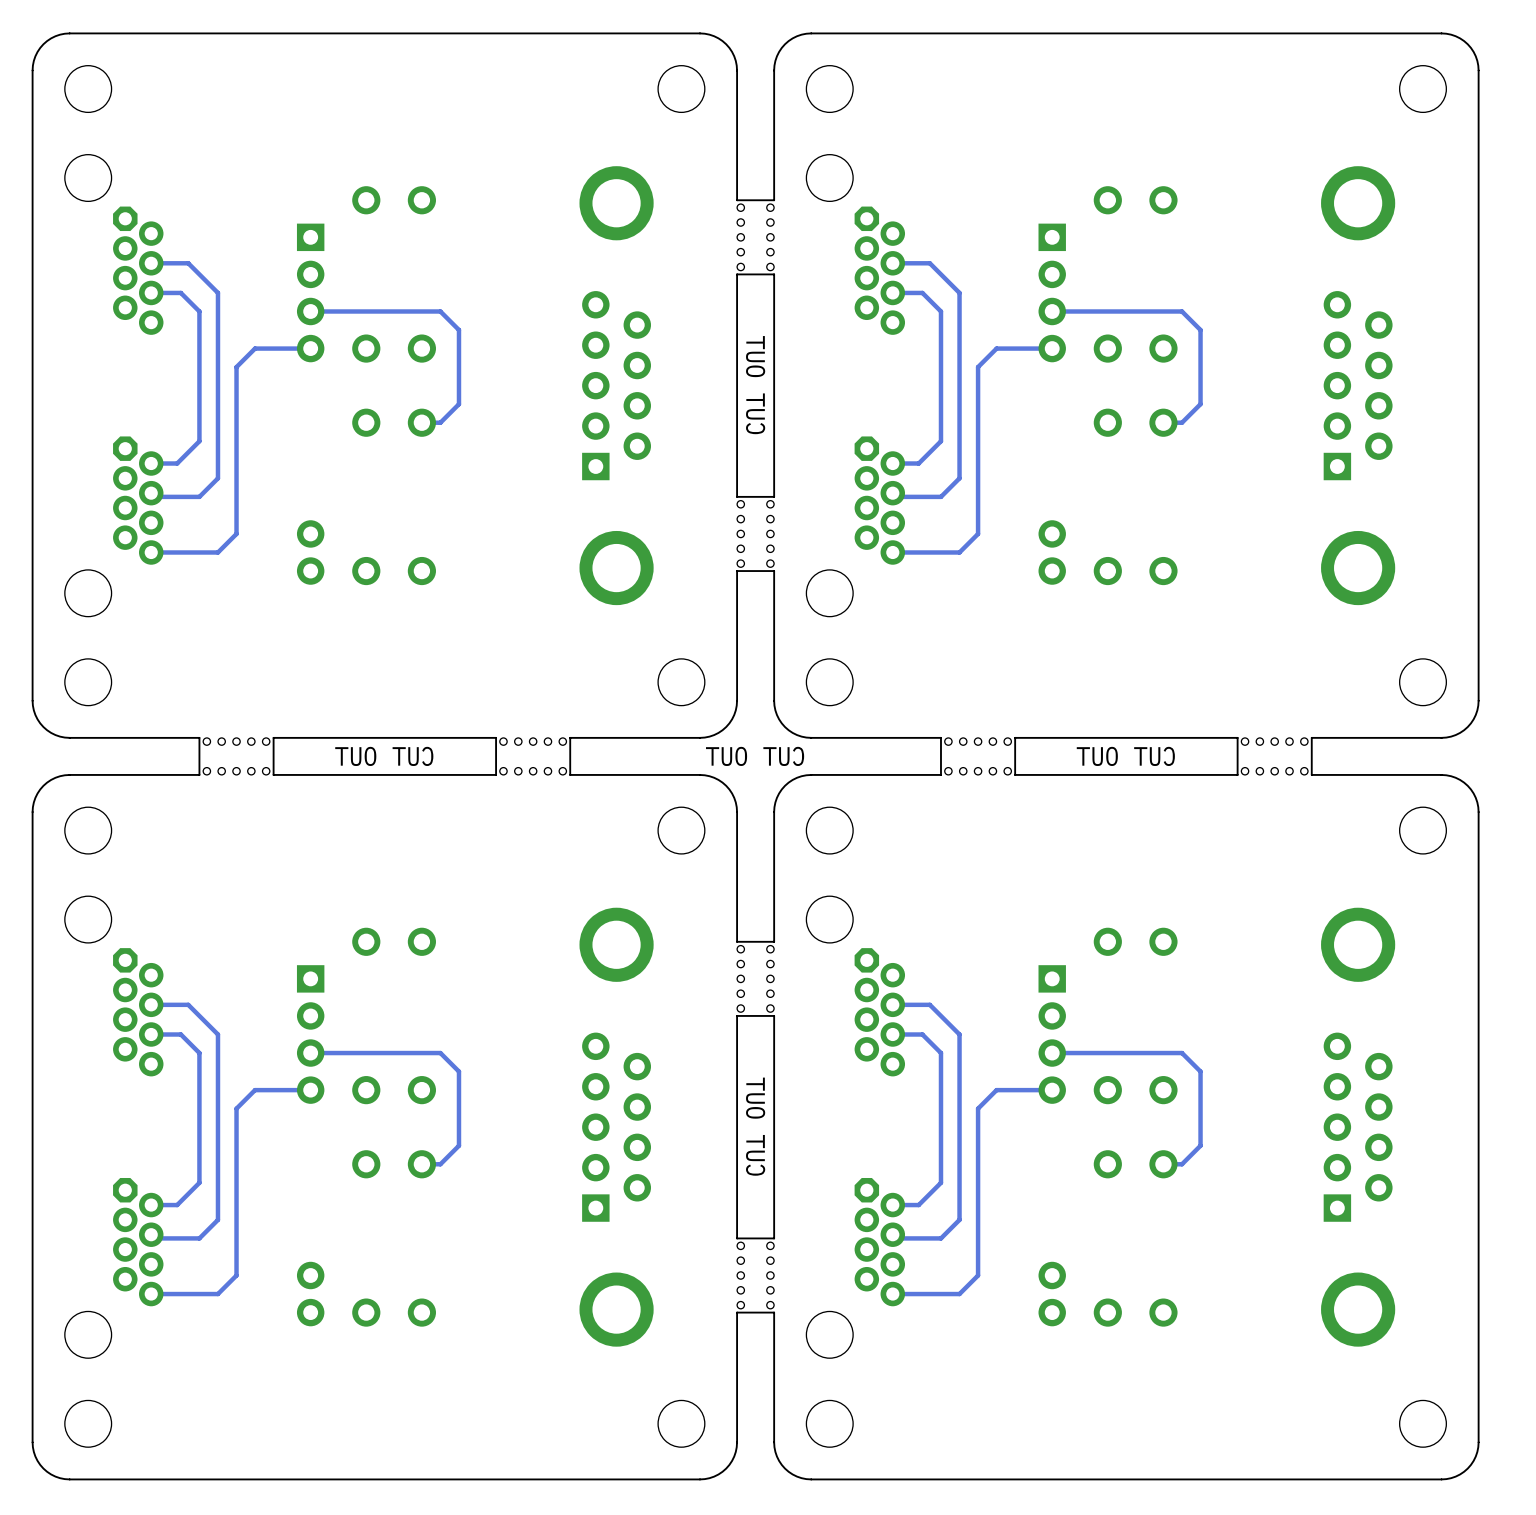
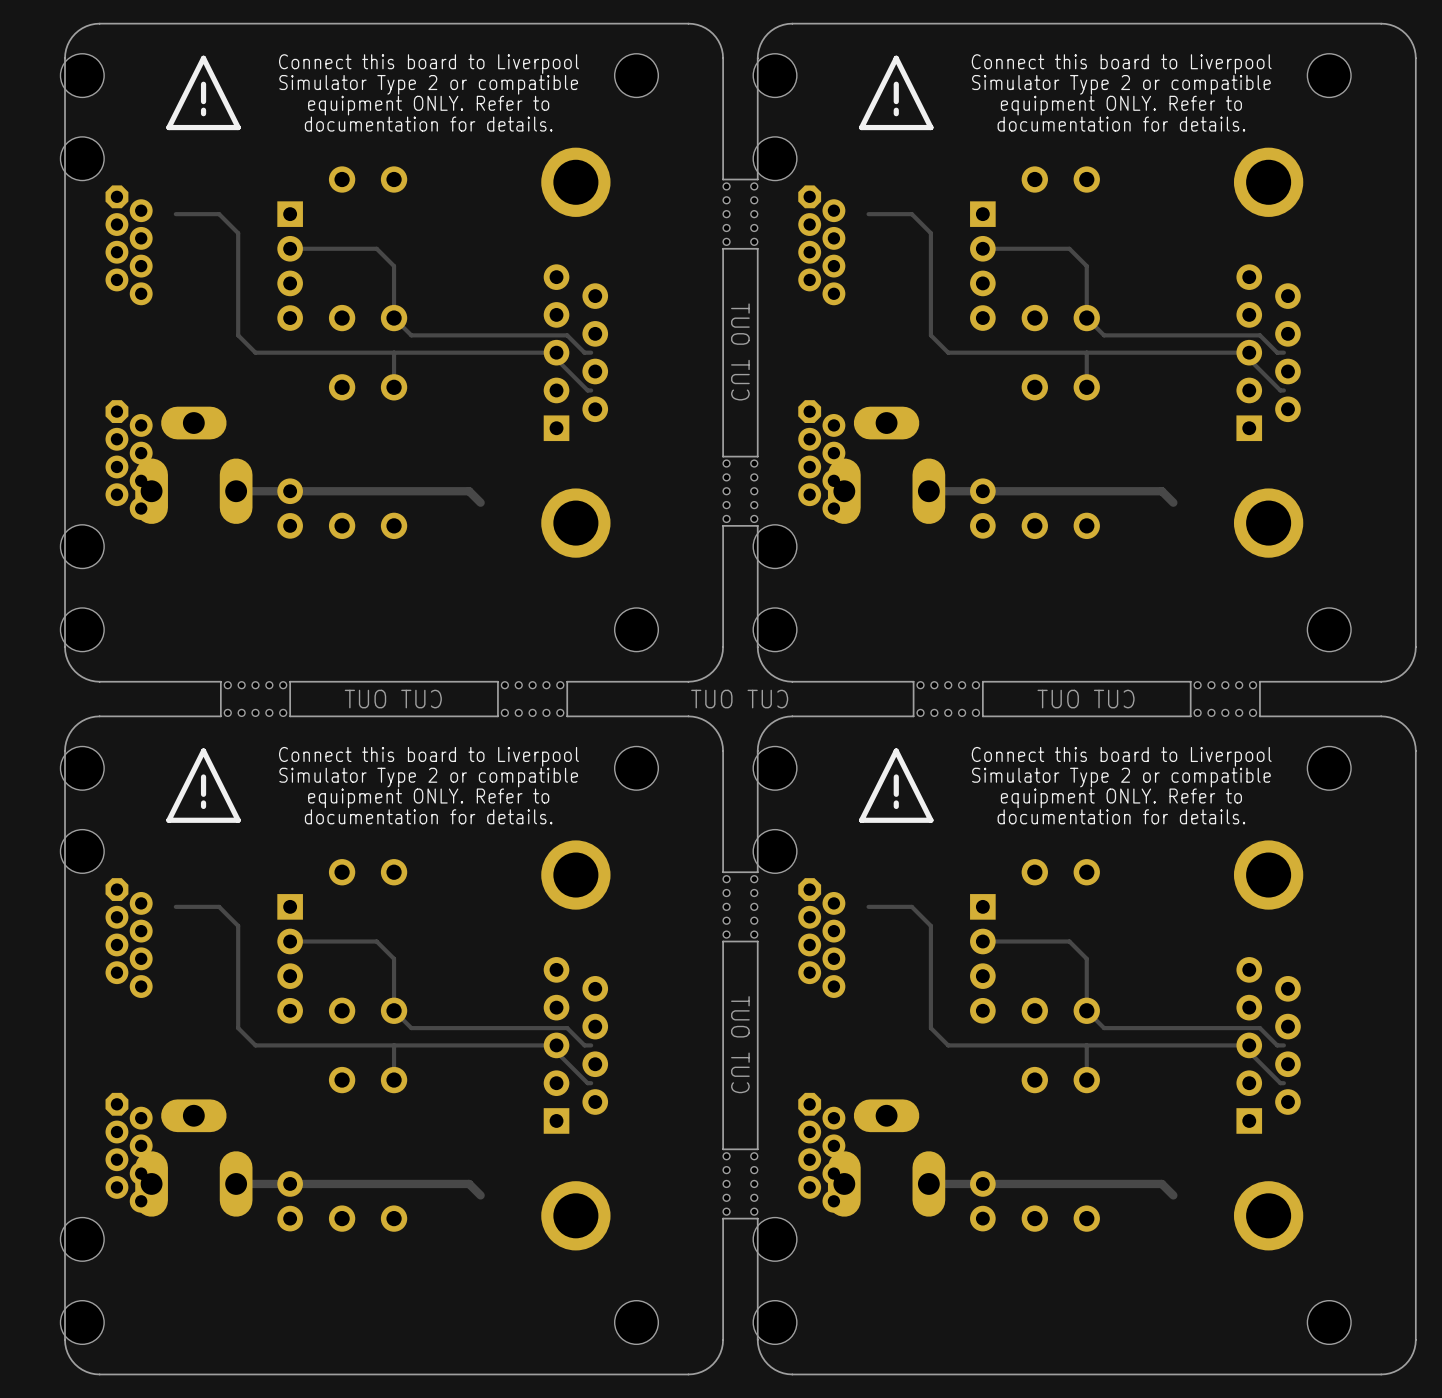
drawing: none -> [166, 55, 241, 131]
drawing: none -> [859, 55, 934, 131]
text: none -> Connect this board to Liverpool (428, 64)
text: none -> Connect this board to Liverpool (1121, 64)
text: none -> Simulator Type 2 or compatible (428, 84)
text: none -> Simulator Type 2 or compatible (1121, 84)
text: none -> equipment ONLY. Refer to (428, 105)
text: none -> equipment ONLY. Refer to (1121, 105)
text: none -> documentation for details. (428, 124)
text: none -> documentation for details. (1121, 124)
track: none -> (175, 214) (219, 214) (238, 233) (238, 335) (255, 352) (549, 352) (587, 390) (591, 390)
track: none -> (868, 214) (911, 214) (930, 233) (930, 335) (948, 352) (1242, 352) (1280, 390) (1283, 390)
track: (151, 263) (188, 263) (217, 292) (217, 478) (199, 496) (154, 496) (151, 493) -> none
track: (892, 263) (929, 263) (959, 292) (959, 478) (940, 496) (896, 496) (892, 493) -> none
track: none -> (290, 248) (376, 248) (394, 266) (394, 318) (411, 335) (567, 335) (584, 352) (591, 352)
track: none -> (982, 248) (1069, 248) (1086, 266) (1086, 318) (1104, 335) (1259, 335) (1277, 352) (1283, 352)
track: (151, 292) (180, 292) (199, 311) (199, 441) (177, 463) (151, 463) -> none
track: (892, 292) (922, 292) (940, 311) (940, 441) (918, 463) (892, 463) -> none
track: (310, 311) (440, 311) (458, 330) (458, 404) (440, 422) (421, 422) -> (394, 352) (394, 387)
track: (1052, 311) (1181, 311) (1200, 330) (1200, 404) (1181, 422) (1163, 422) -> (1086, 352) (1086, 387)
track: (310, 348) (255, 348) (236, 367) (236, 533) (217, 552) (151, 552) -> none
track: (1052, 348) (996, 348) (978, 367) (978, 533) (959, 552) (892, 552) -> none
part: none -> (193, 465)
part: none -> (886, 465)
track: none -> (236, 491) (469, 491) (480, 502)
track: none -> (928, 491) (1161, 491) (1173, 502)
part position: (755, 756) -> (740, 699)
drawing: none -> [166, 748, 241, 823]
drawing: none -> [859, 748, 934, 823]
text: none -> Connect this board to Liverpool (428, 756)
text: none -> Connect this board to Liverpool (1121, 756)
text: none -> Simulator Type 2 or compatible (428, 777)
text: none -> Simulator Type 2 or compatible (1121, 777)
text: none -> equipment ONLY. Refer to (428, 798)
text: none -> equipment ONLY. Refer to (1121, 798)
text: none -> documentation for details. (428, 816)
text: none -> documentation for details. (1121, 816)
track: none -> (175, 906) (219, 906) (238, 925) (238, 1028) (255, 1045) (549, 1045) (587, 1083) (591, 1083)
track: none -> (868, 906) (911, 906) (930, 925) (930, 1028) (948, 1045) (1242, 1045) (1280, 1083) (1283, 1083)
track: (151, 1004) (188, 1004) (217, 1034) (217, 1219) (199, 1238) (154, 1238) (151, 1234) -> none
track: (892, 1004) (929, 1004) (959, 1034) (959, 1219) (940, 1238) (896, 1238) (892, 1234) -> none
track: none -> (290, 941) (376, 941) (394, 958) (394, 1010) (411, 1028) (567, 1028) (584, 1045) (591, 1045)
track: none -> (982, 941) (1069, 941) (1086, 958) (1086, 1010) (1104, 1028) (1259, 1028) (1277, 1045) (1283, 1045)
track: (151, 1034) (180, 1034) (199, 1053) (199, 1182) (177, 1205) (151, 1205) -> none
track: (892, 1034) (922, 1034) (940, 1053) (940, 1182) (918, 1205) (892, 1205) -> none
track: (310, 1053) (440, 1053) (458, 1071) (458, 1145) (440, 1164) (421, 1164) -> (394, 1045) (394, 1080)
track: (1052, 1053) (1181, 1053) (1200, 1071) (1200, 1145) (1181, 1164) (1163, 1164) -> (1086, 1045) (1086, 1080)
track: (310, 1090) (255, 1090) (236, 1108) (236, 1275) (217, 1294) (151, 1294) -> none
track: (1052, 1090) (996, 1090) (978, 1108) (978, 1275) (959, 1294) (892, 1294) -> none
part: none -> (193, 1158)
part: none -> (886, 1158)
track: none -> (236, 1183) (469, 1183) (480, 1195)
track: none -> (928, 1183) (1161, 1183) (1173, 1195)

